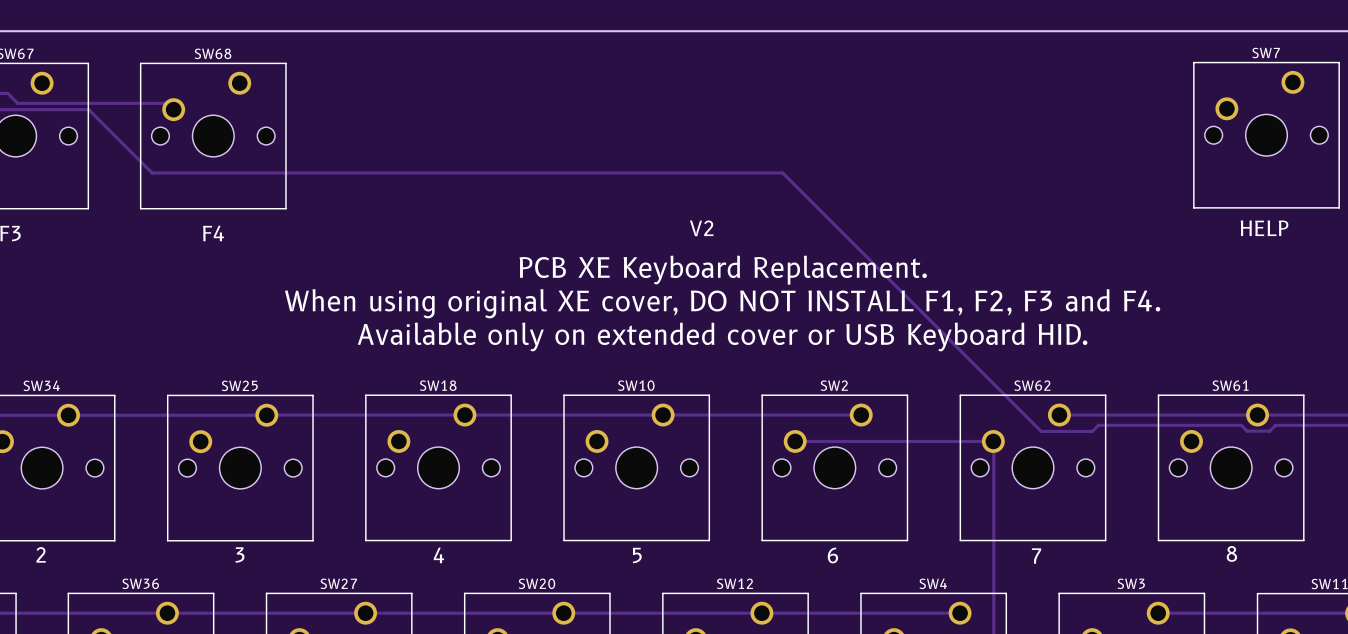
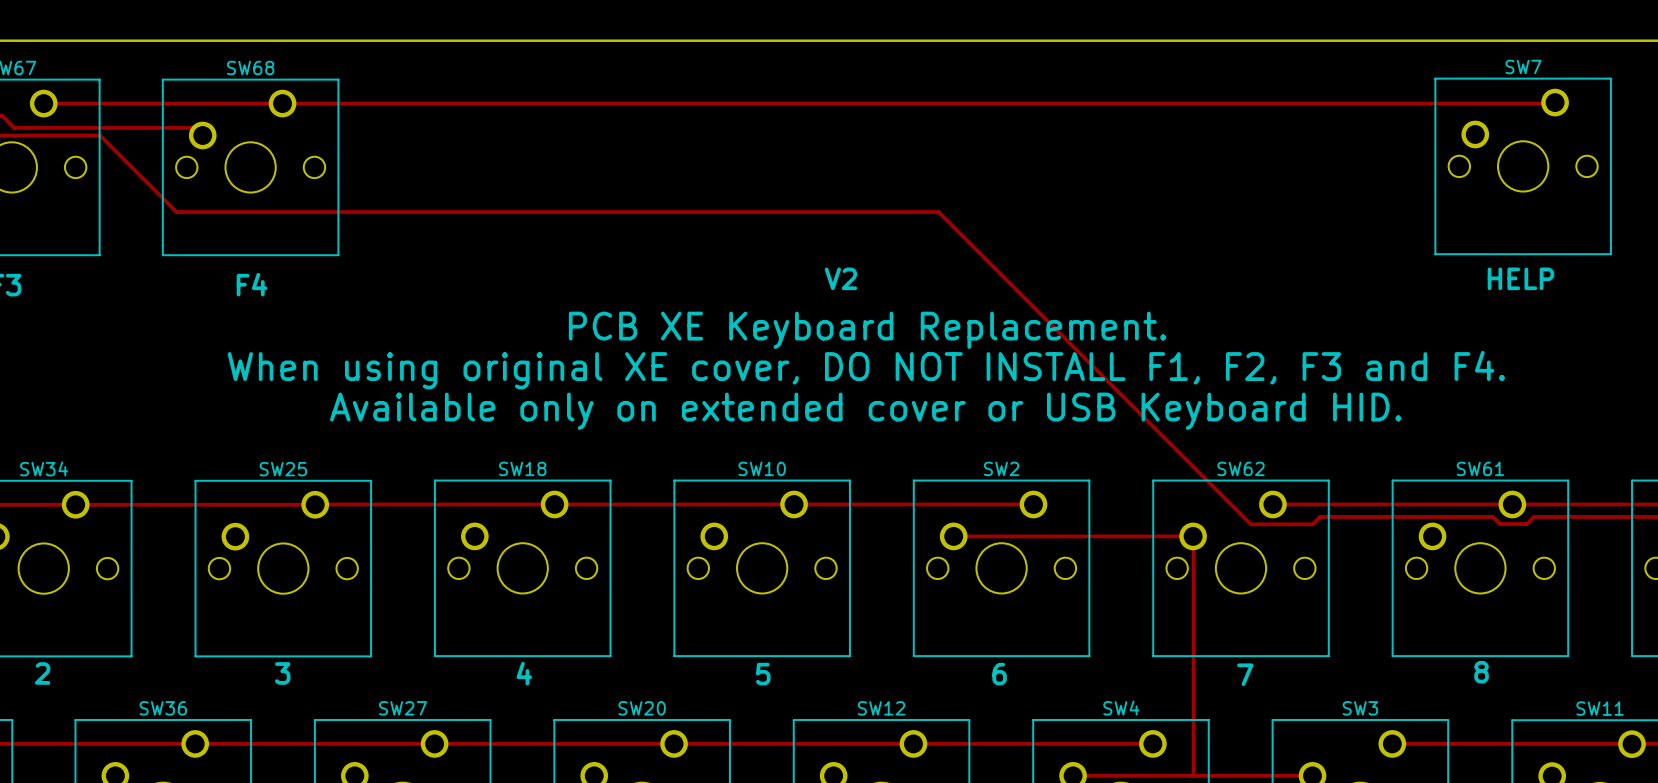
track: none -> (1555, 102) (43, 103)

